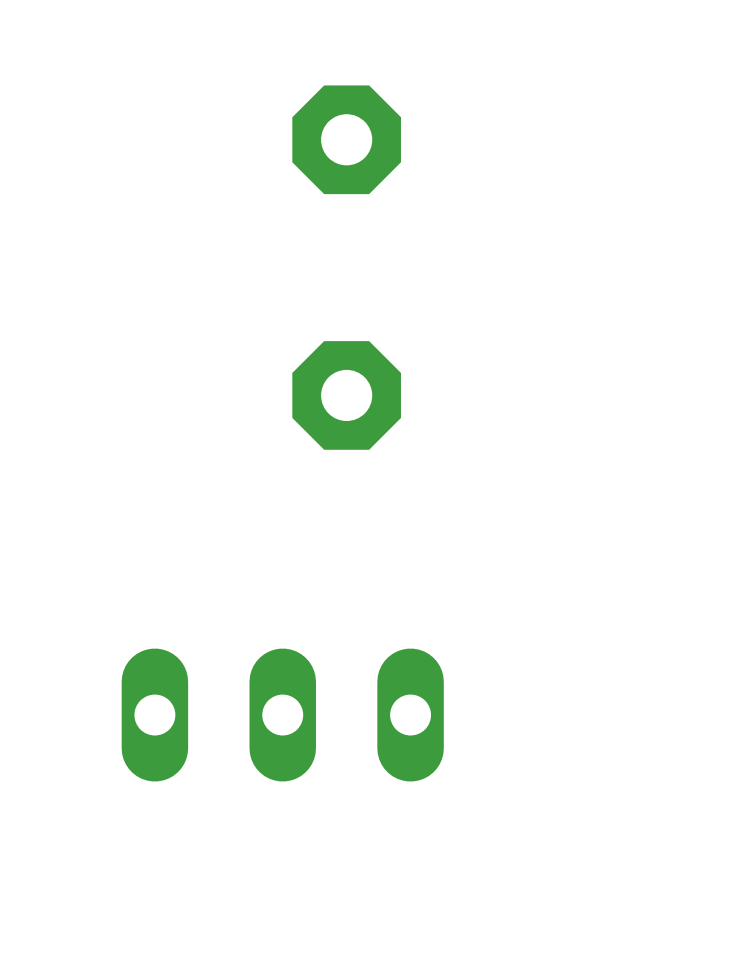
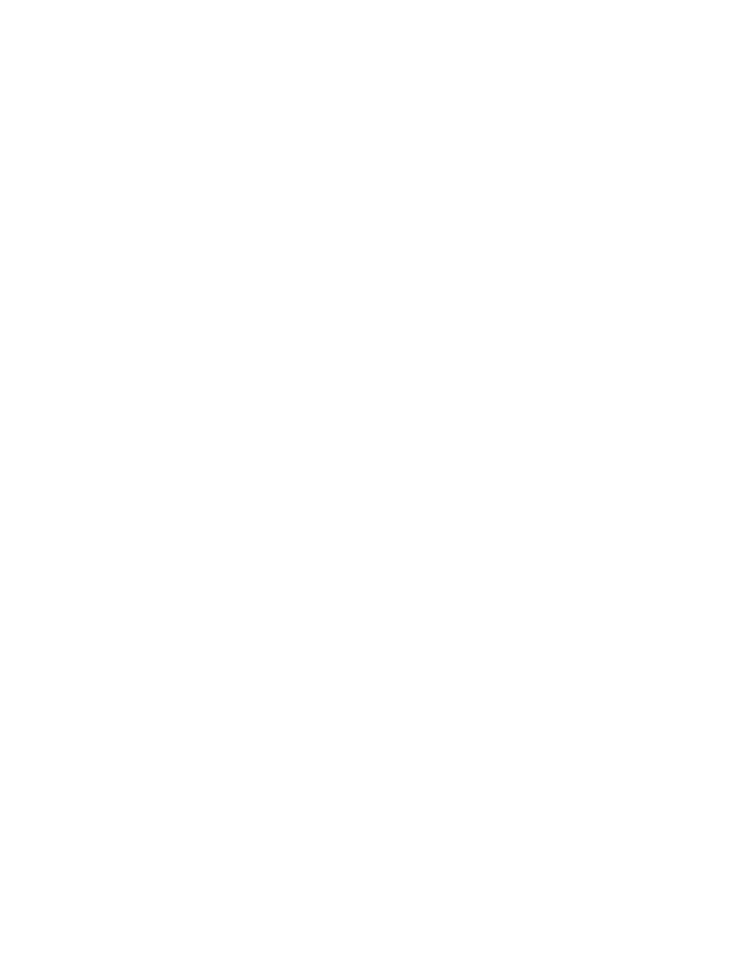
part: (346, 139) -> none
part: (346, 395) -> none
part: (282, 715) -> none

